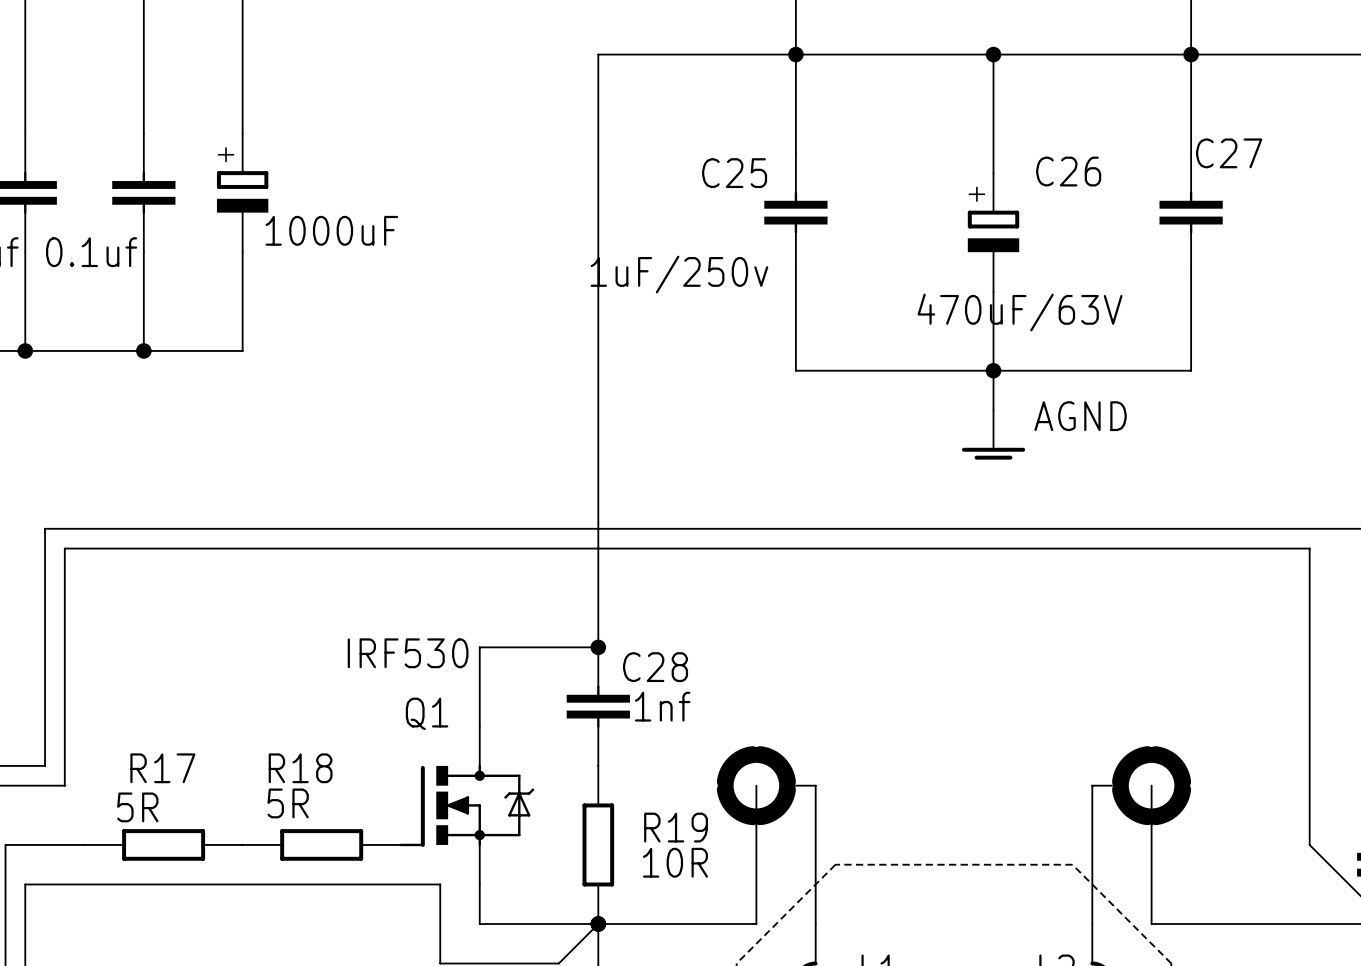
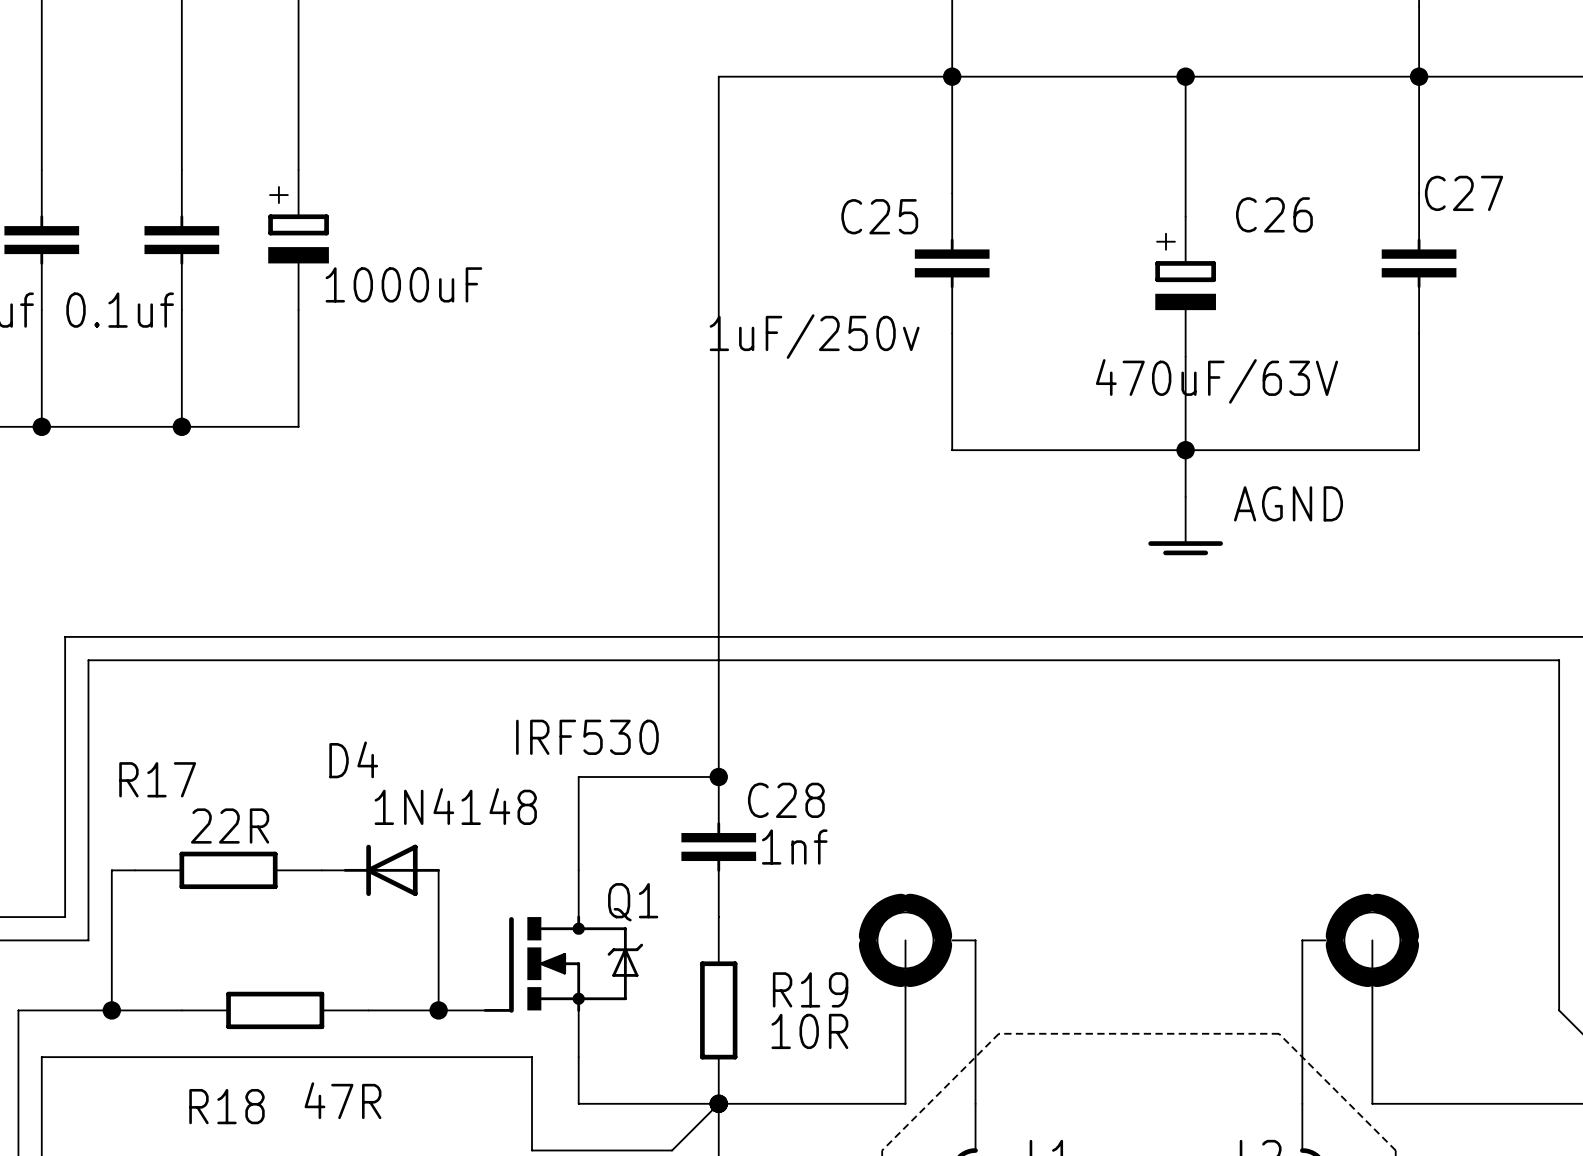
text: none -> D4 (353, 759)
Q1 value position: IRF530 (408, 653) -> IRF530 (587, 737)
text: none -> 1N4148 (455, 806)
Q1 name position: Q1 (427, 713) -> Q1 (633, 902)
wire: none -> (135, 870) (111, 870) (111, 1010) (181, 1010)
wire: none -> (321, 870) (345, 870)
part: none -> (391, 870)
wire: none -> (438, 870) (438, 1010)
R17 name position: R17 (162, 768) -> R17 (157, 779)
R18 name position: R18 (300, 768) -> R18 (226, 1106)
R18 value: 5R (288, 803) -> 47R (343, 1100)
R17 value: 5R (137, 807) -> 22R (230, 826)
junction: none -> (111, 1010)
R17 position: (163, 844) -> (228, 870)
wire: none -> (368, 1010) (485, 1010)
R18 position: (321, 844) -> (275, 1010)
junction: none -> (438, 1010)

